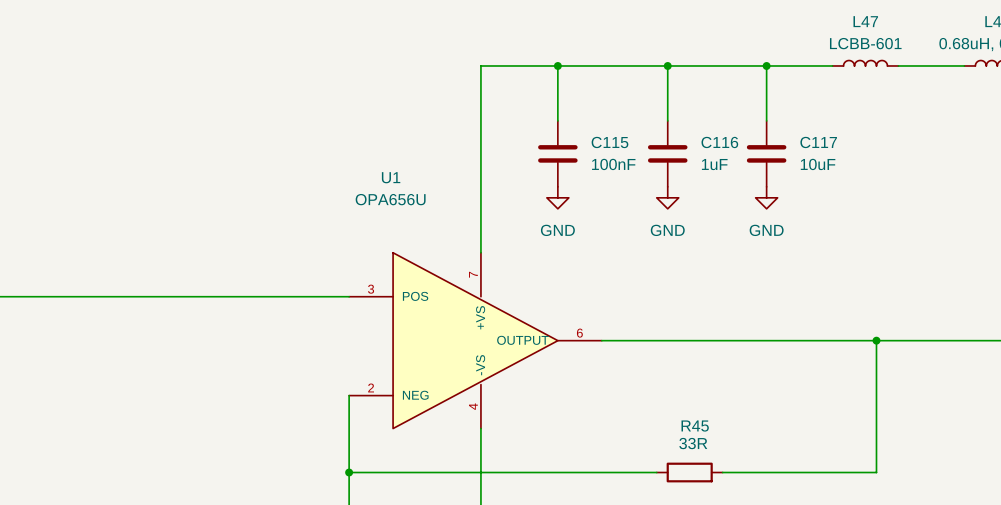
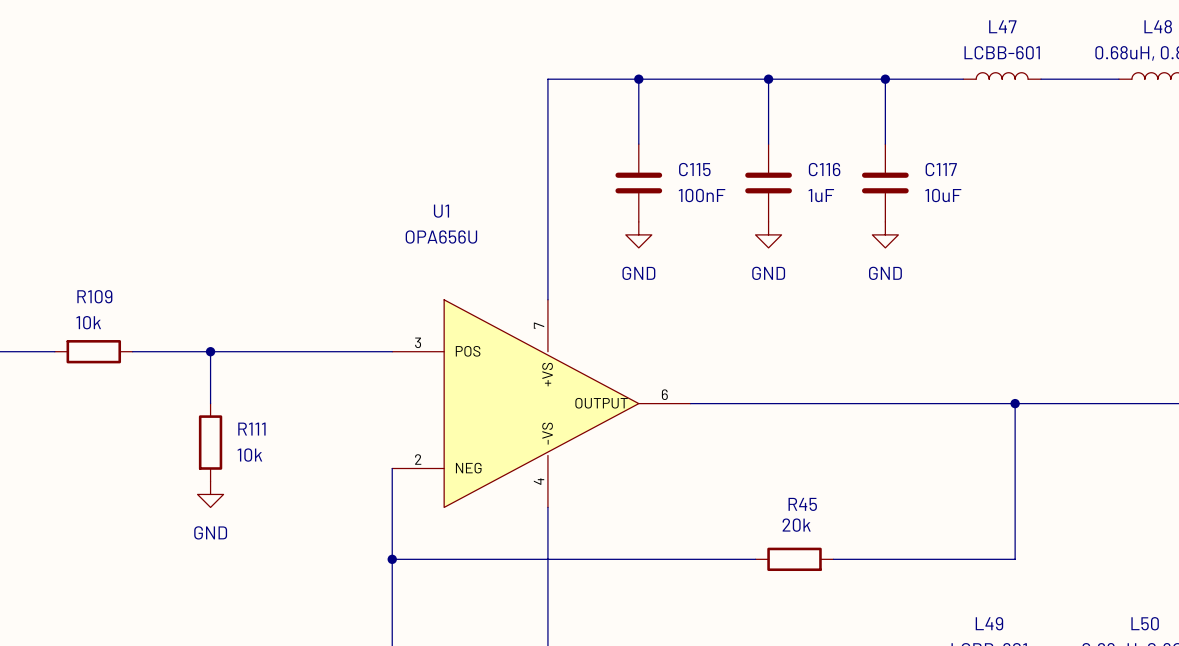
wire: (63, 296) (129, 296) -> none
R109: none -> 10k (93, 351)
wire: none -> (210, 351) (210, 403)
junction: none -> (210, 351)
R111: none -> 10k (210, 442)
power symbol: none -> GND (210, 494)
R45 value: 33R (693, 443) -> 20k (796, 525)

